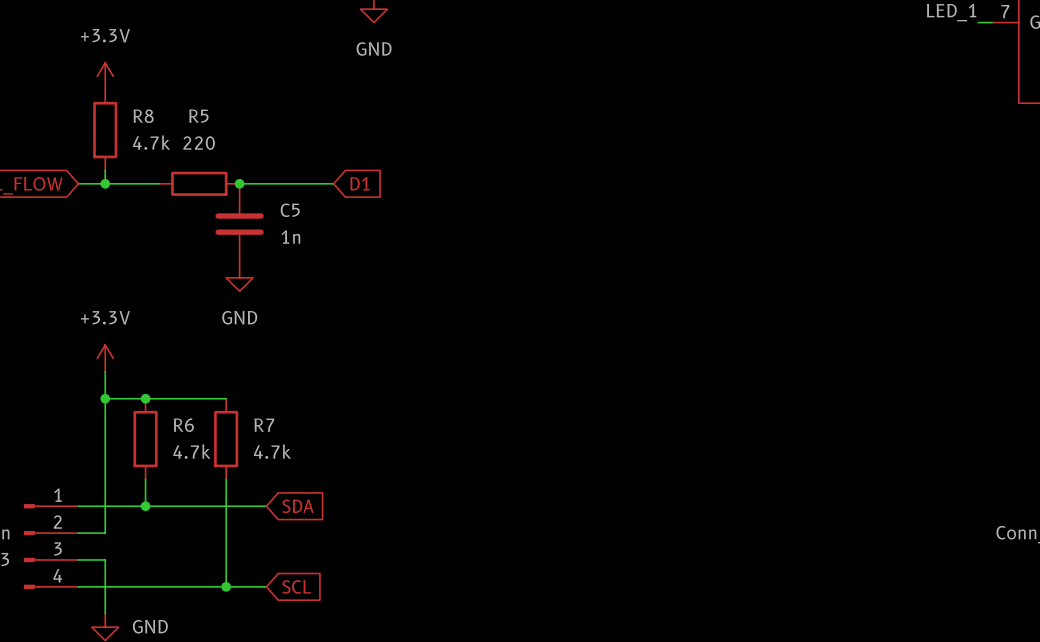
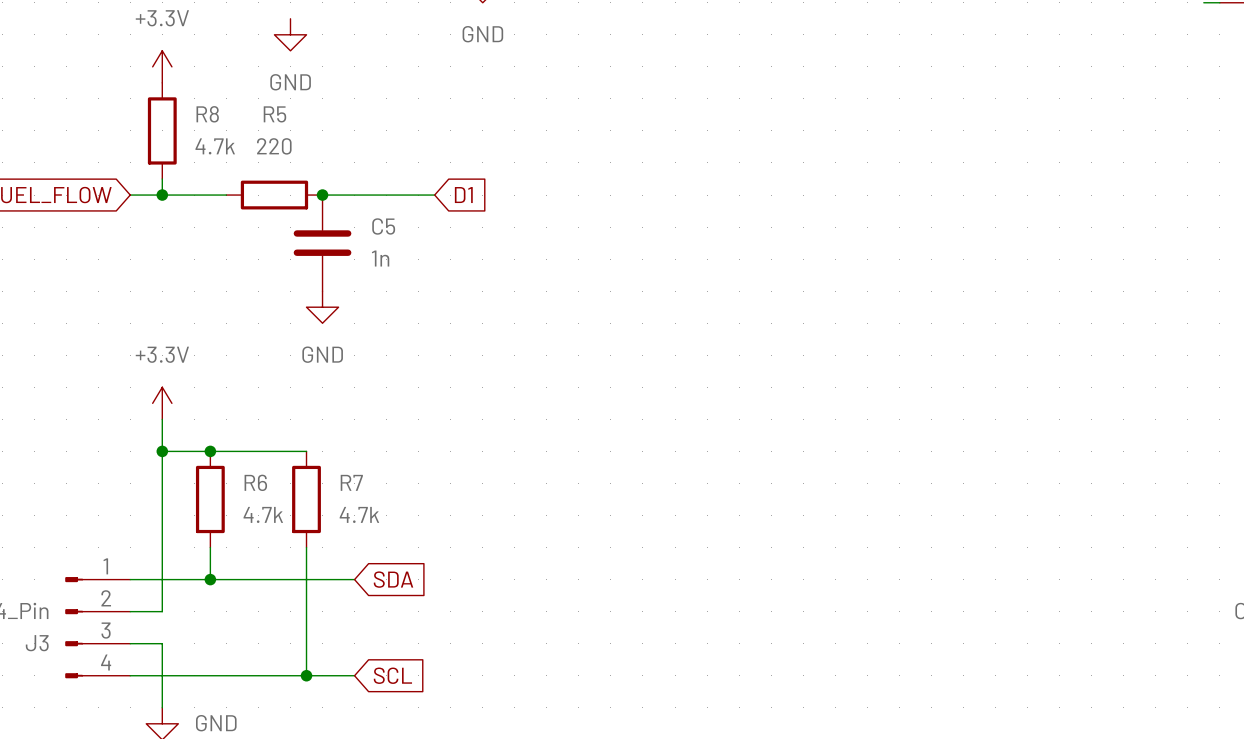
power symbol: none -> GND (290, 34)

